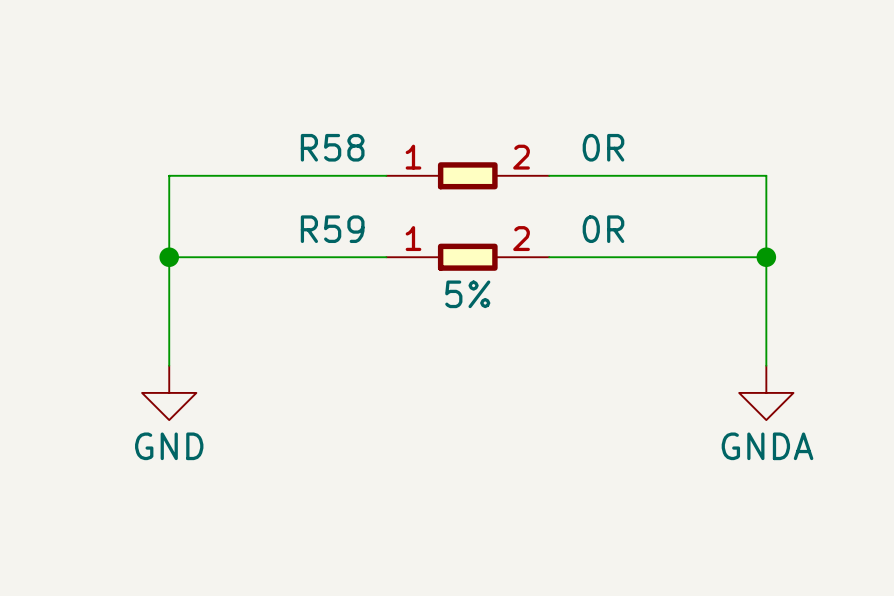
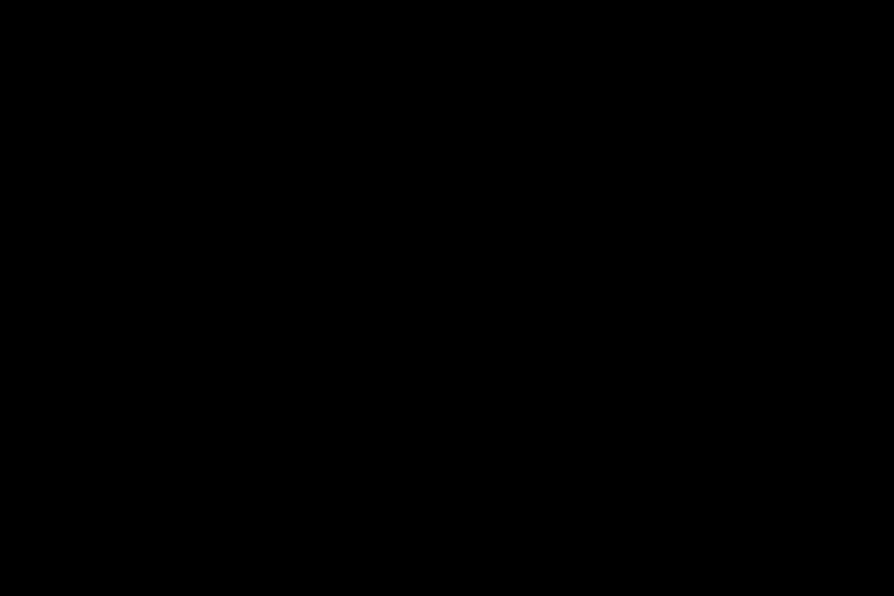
wire: (386, 175) (169, 175) (169, 365) -> none
R58: 0R (467, 175) -> none
wire: (549, 175) (766, 175) (766, 365) -> none
wire: (169, 257) (386, 257) -> none
junction: (169, 257) -> none
R59: 0R (467, 257) -> none
wire: (549, 257) (766, 257) -> none
junction: (766, 257) -> none
power symbol: GND (169, 392) -> none
power symbol: GNDA (766, 392) -> none

